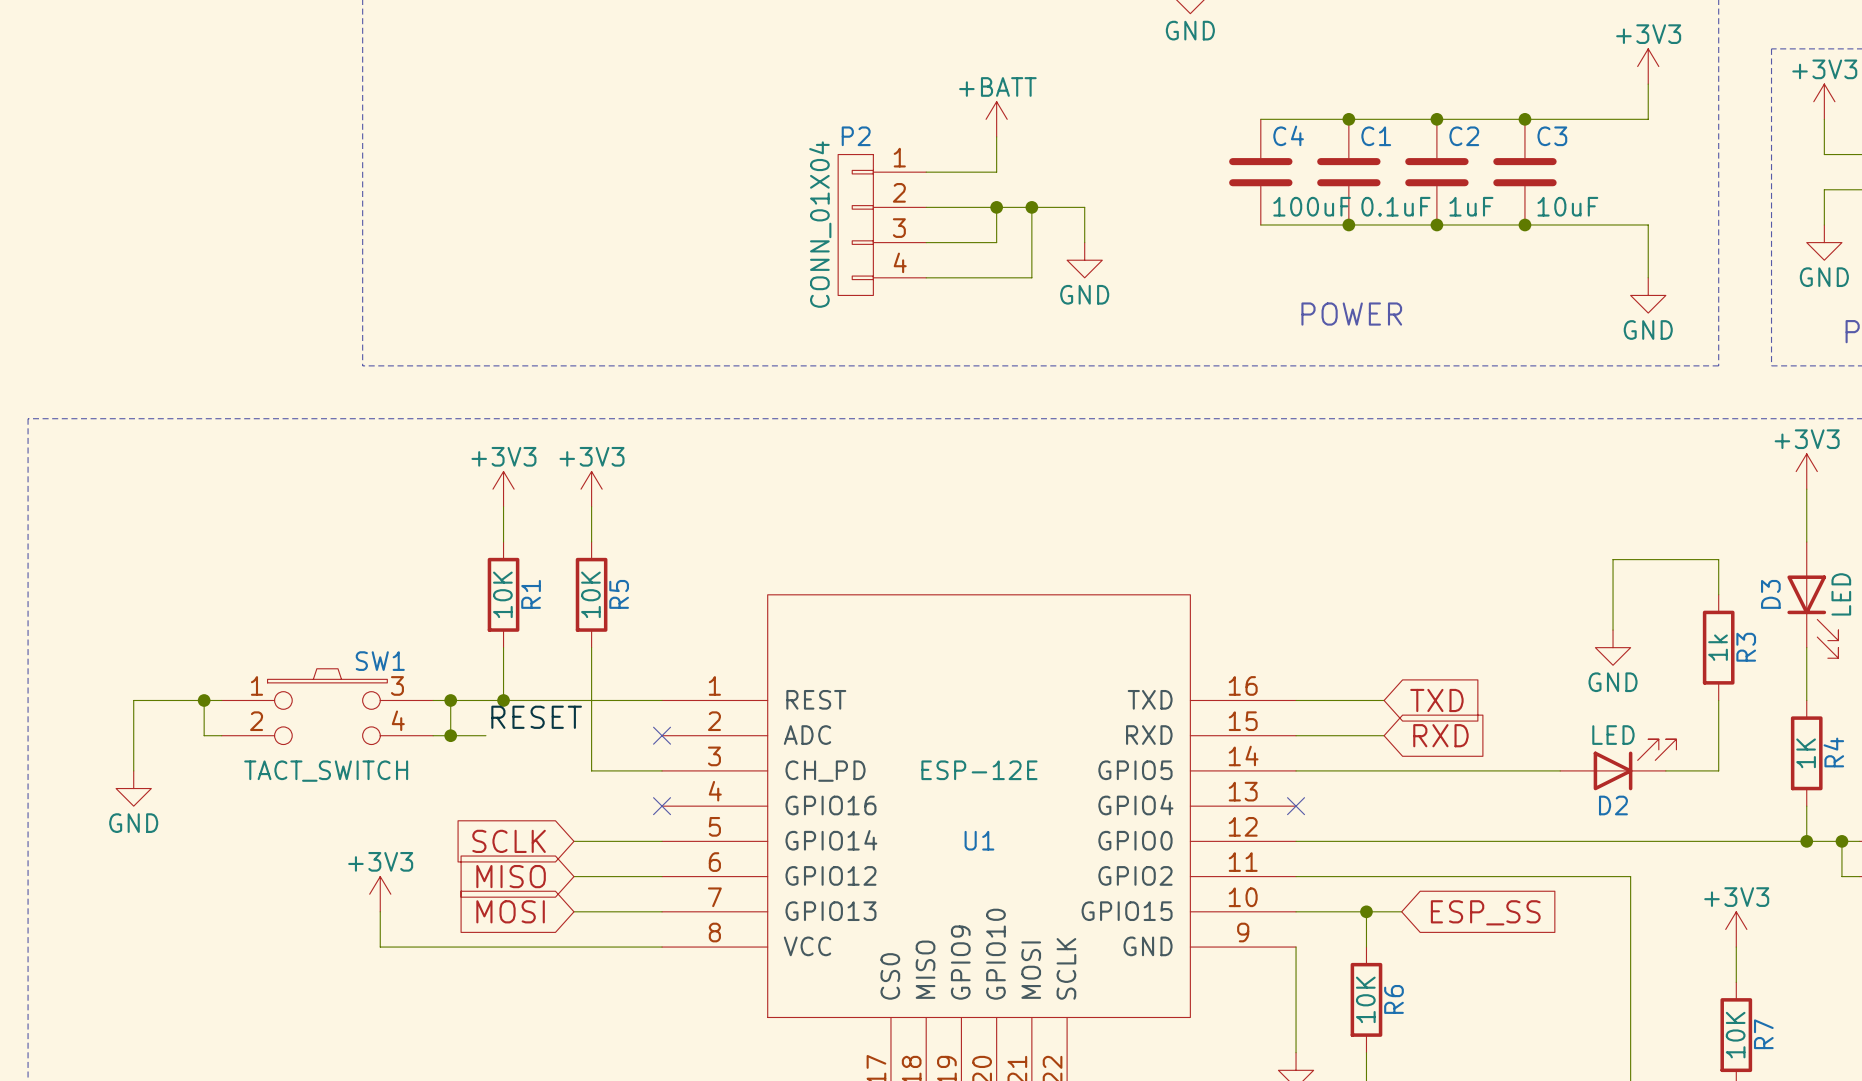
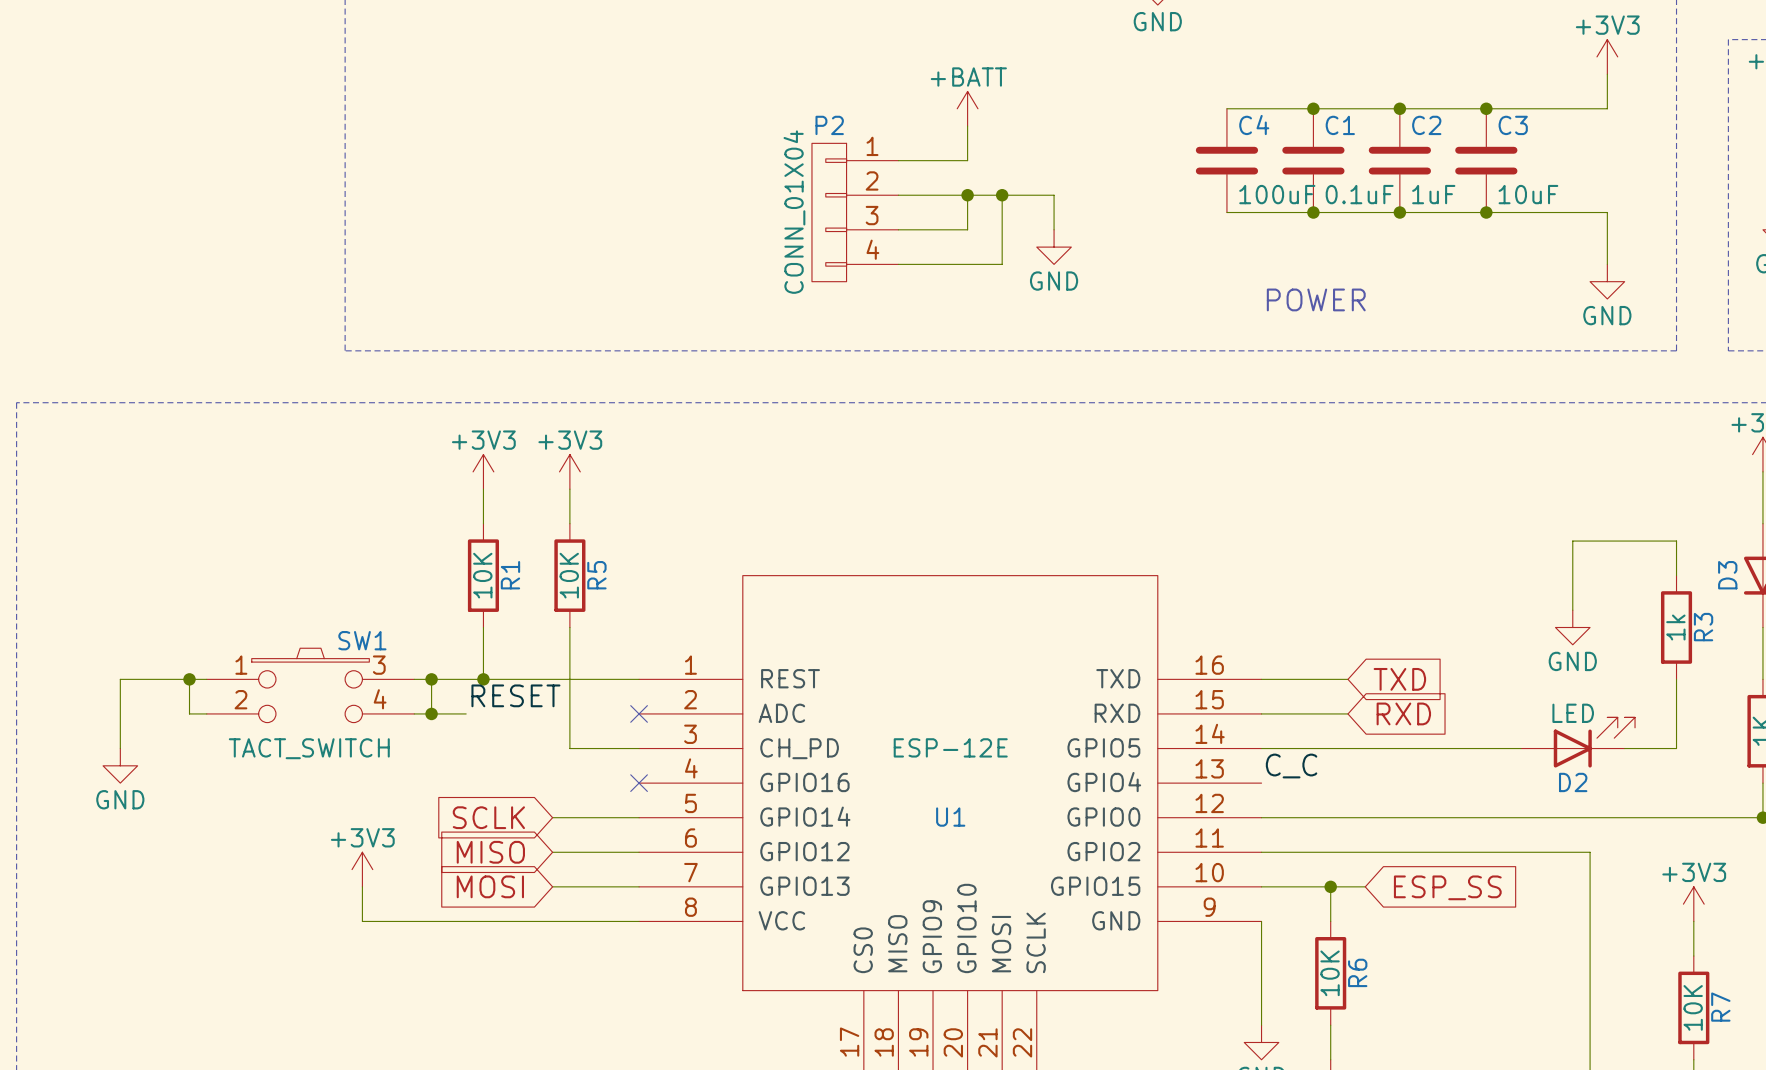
label: none -> C_C (1291, 766)
no-connect mark: (1296, 806) -> none

